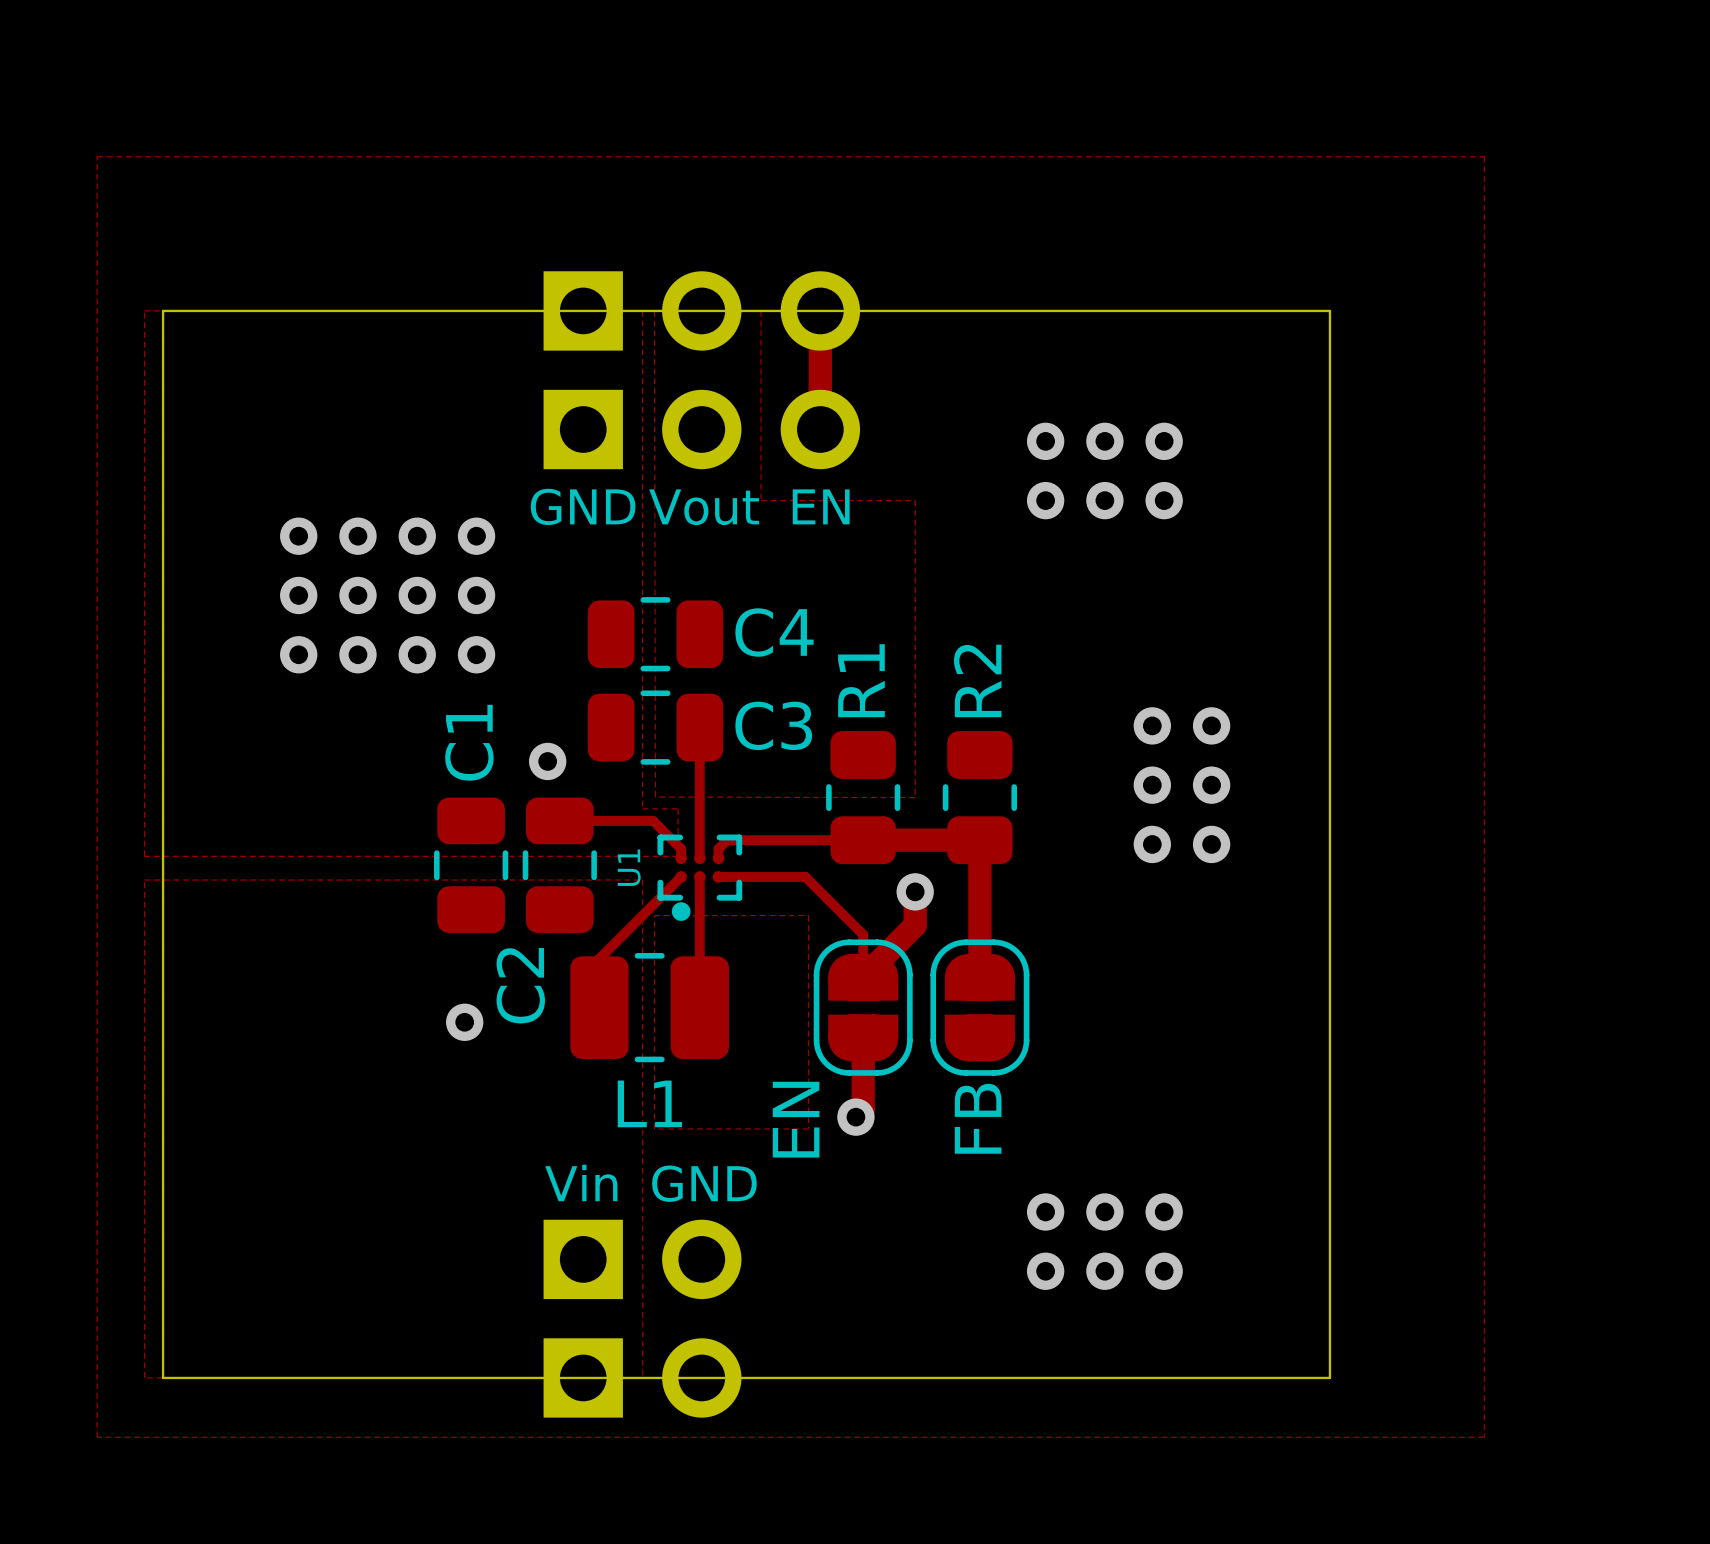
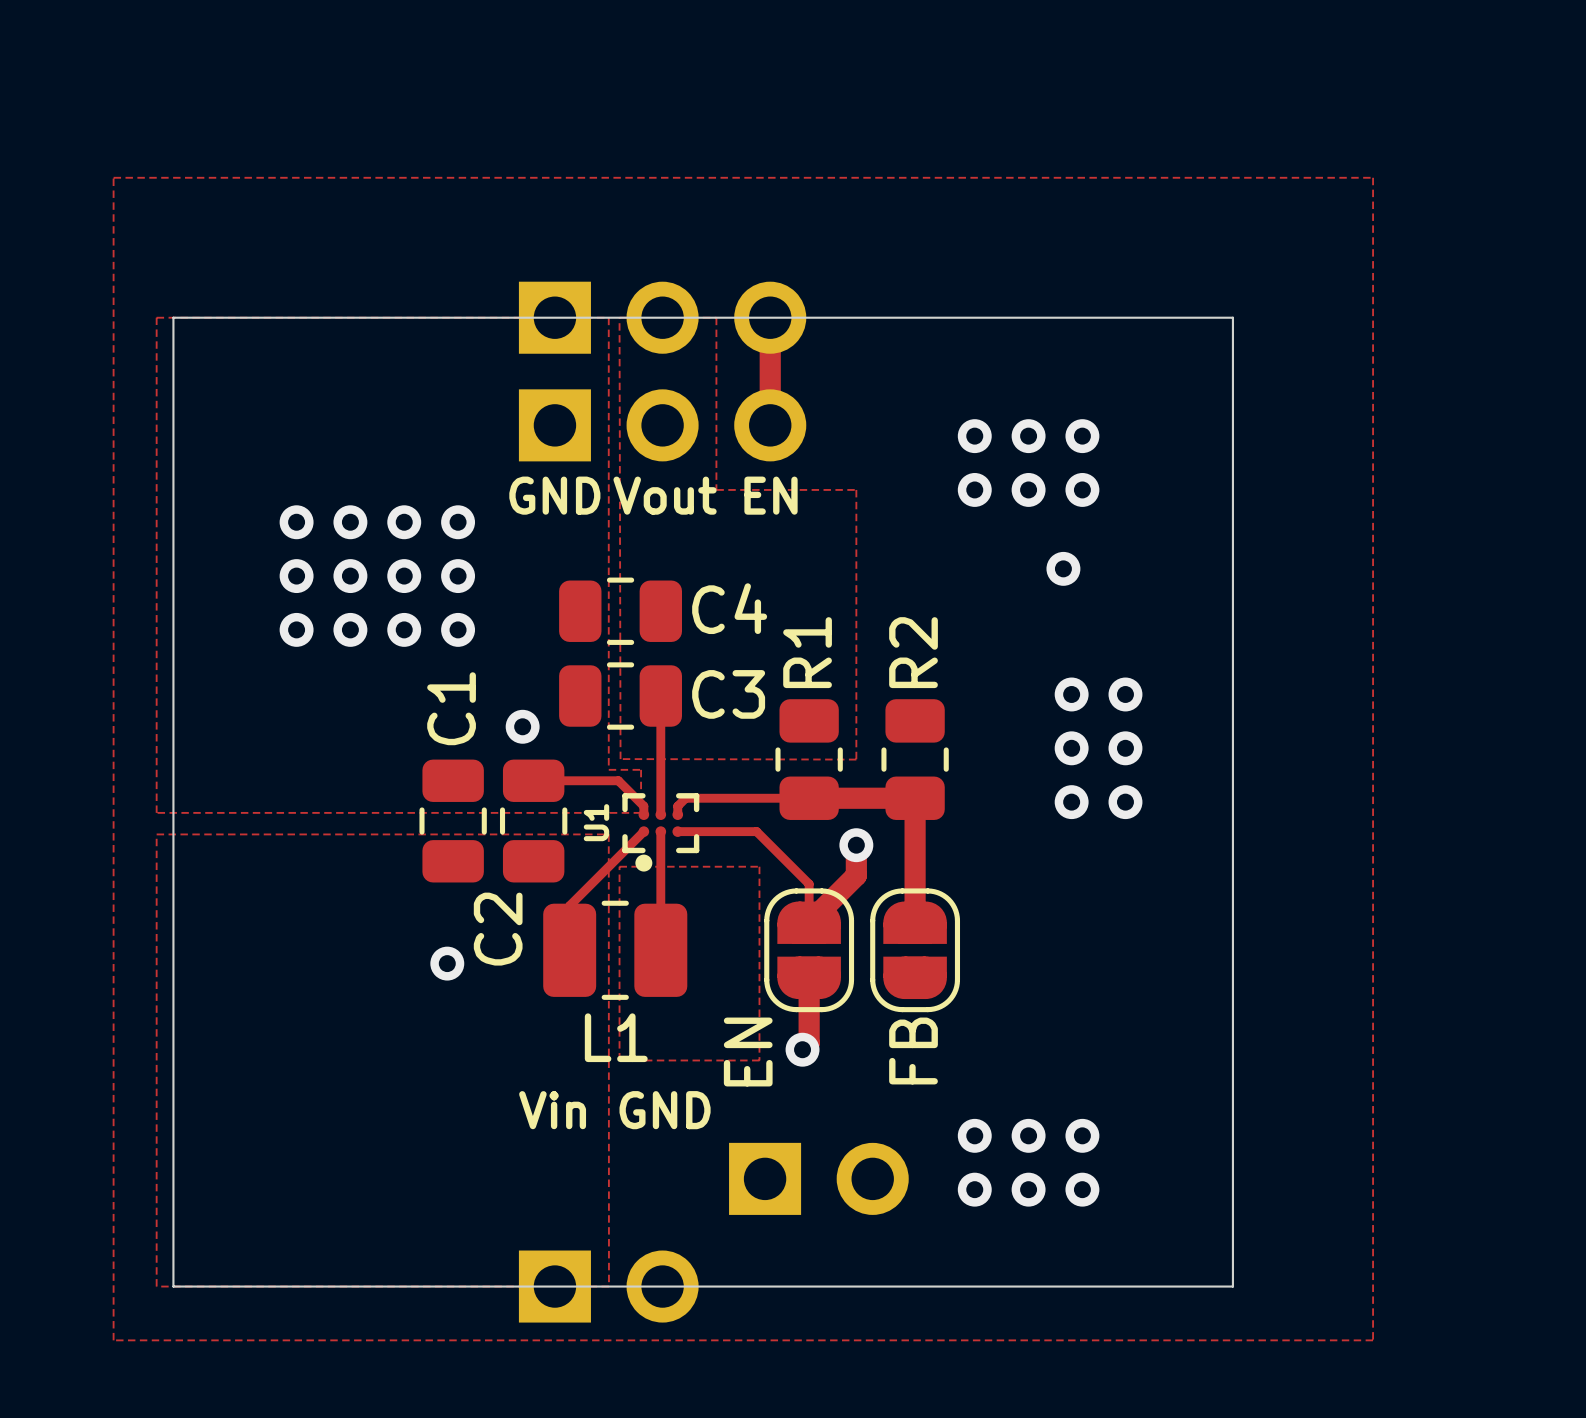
via: none -> (1063, 568)
part position: (642, 1259) -> (818, 1178)

